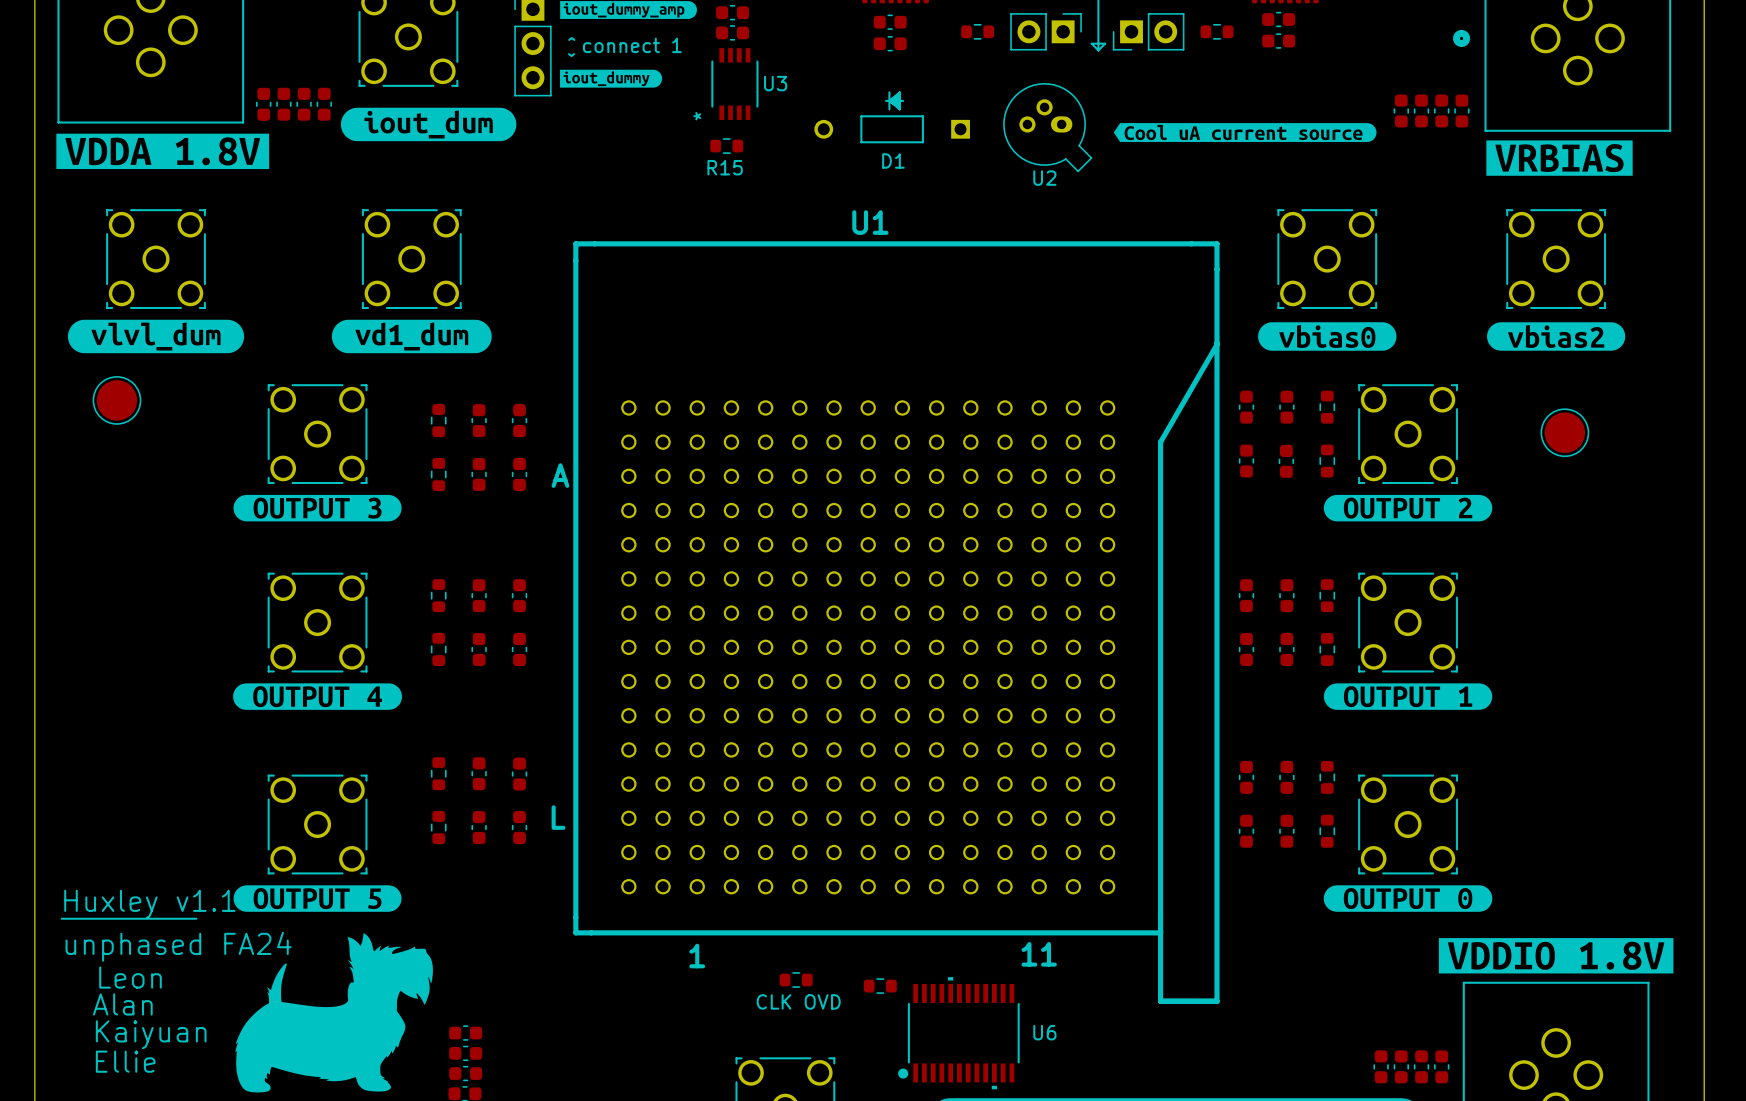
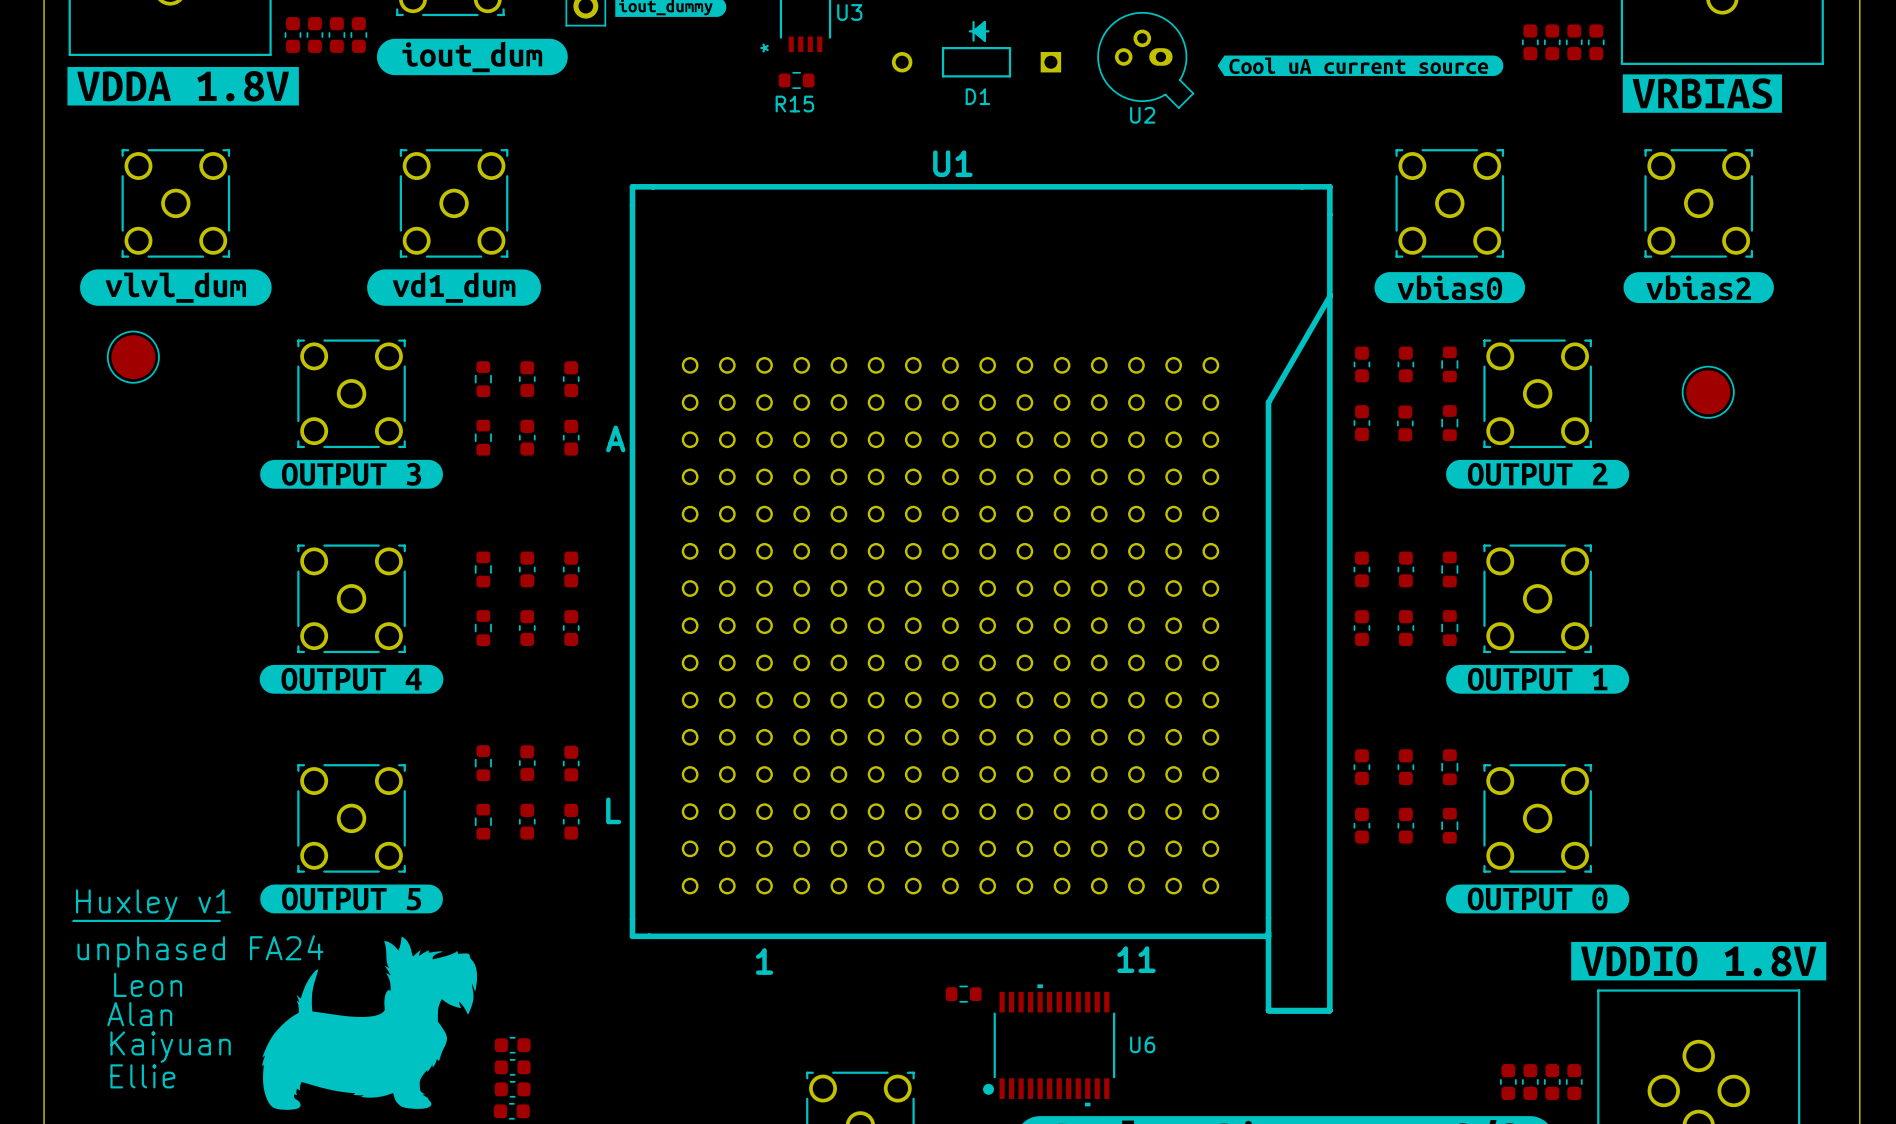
text: Huxley v1.1 (149, 904) -> Huxley v1 (153, 905)
part: (796, 980) -> none
text: CLK OVD (798, 1001) -> none

